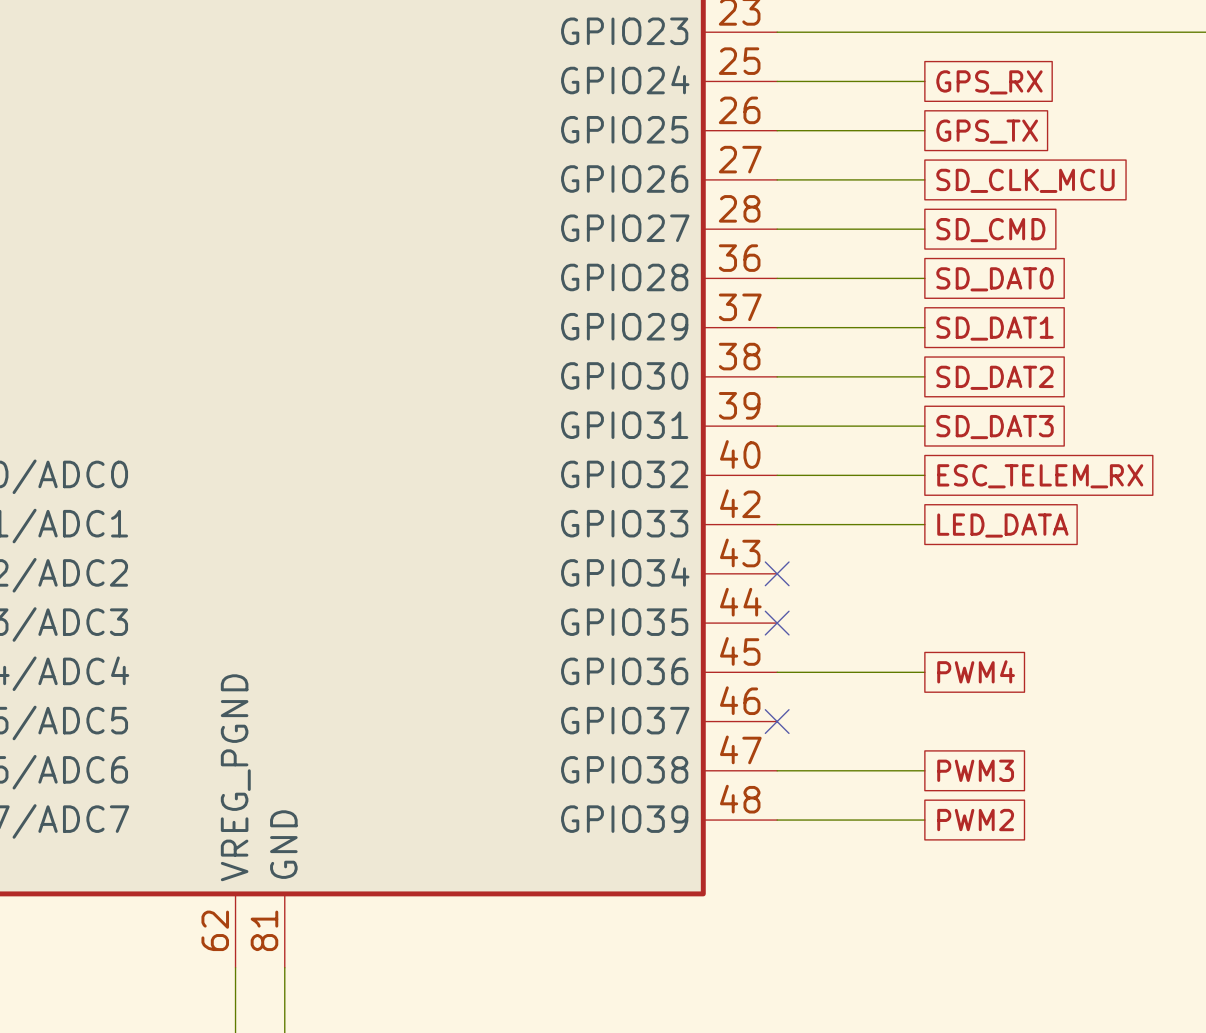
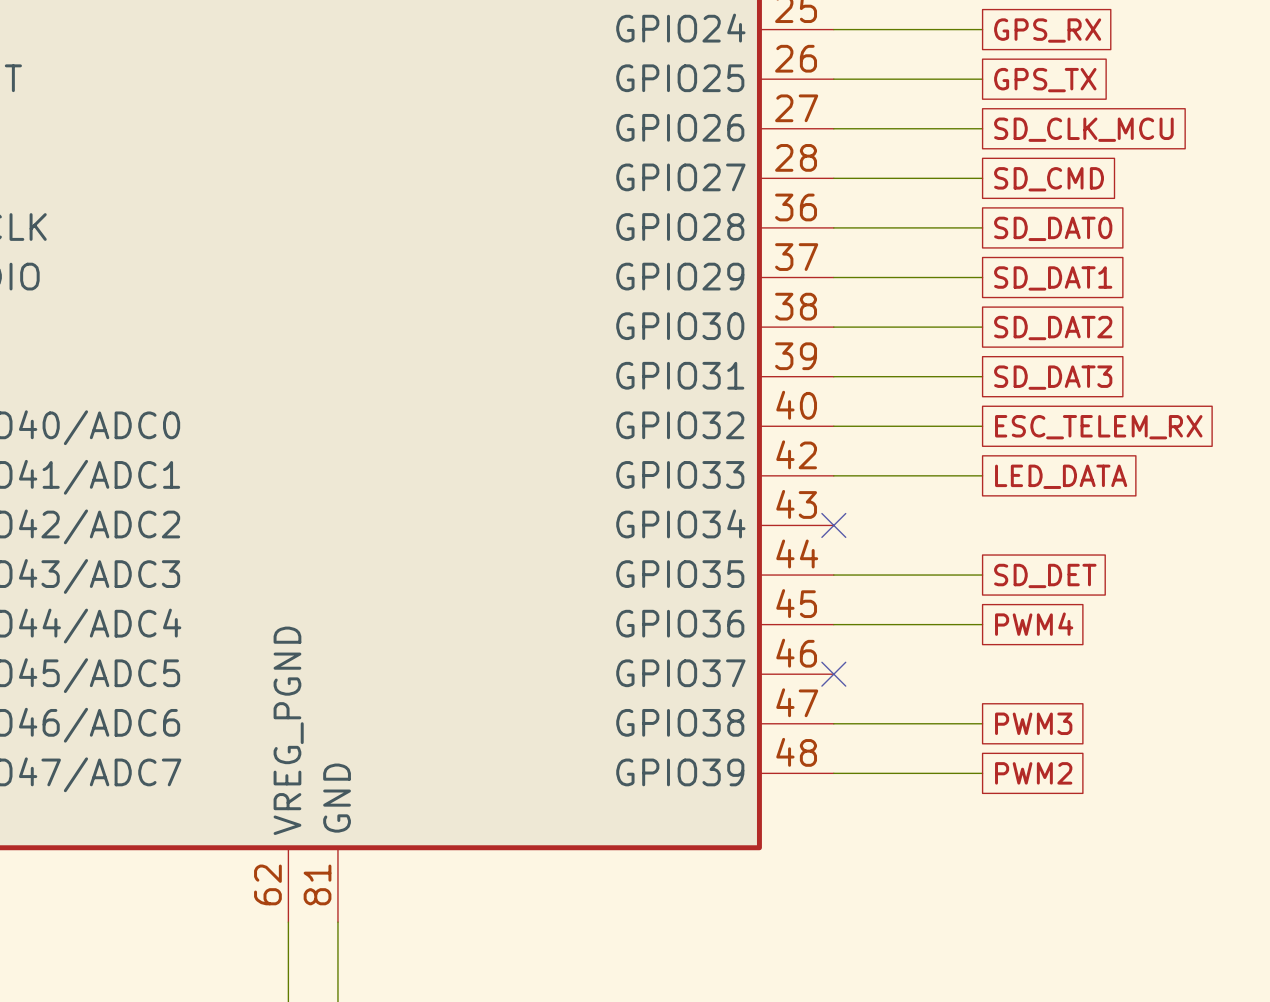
wire: none -> (833, 575) (982, 575)
no-connect mark: (777, 623) -> none
global label: none -> SD_DET (1045, 575)

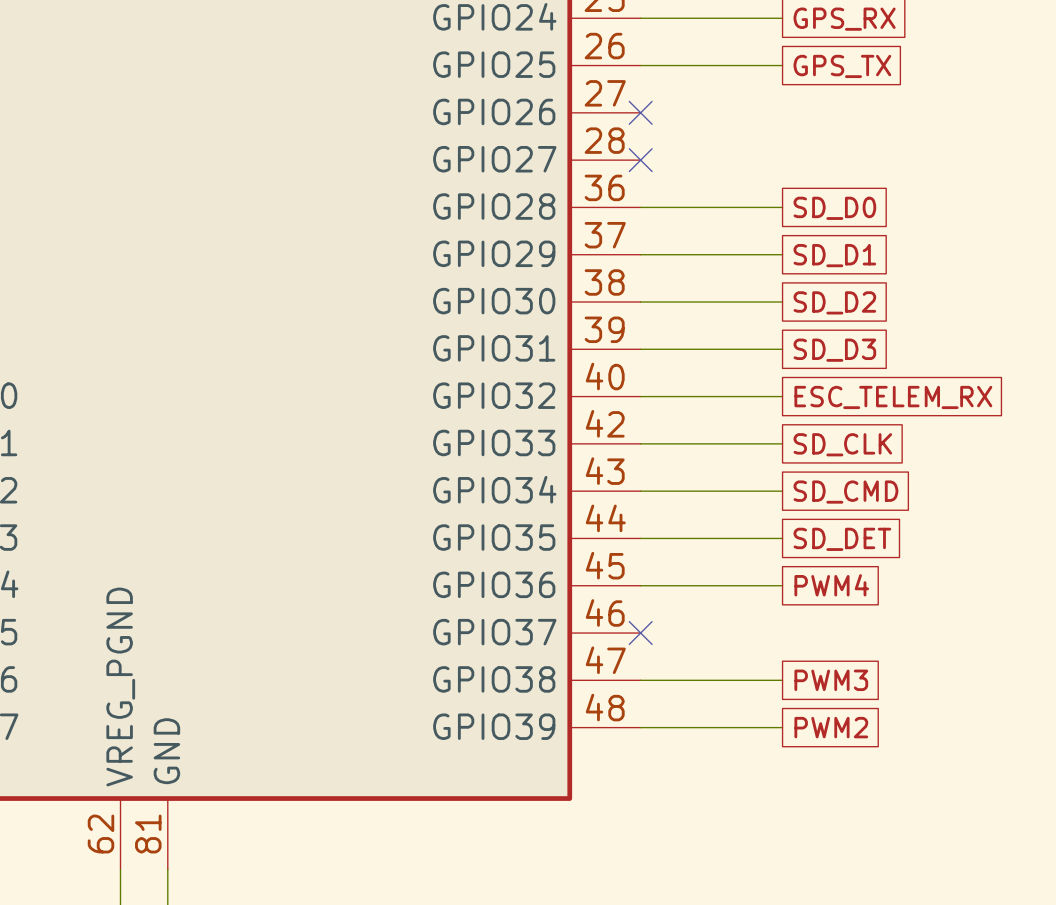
wire: (833, 128) (982, 128) -> none
no-connect mark: none -> (640, 112)
global label: SD_CLK_MCU (1083, 129) -> none
wire: (833, 178) (982, 178) -> (640, 491) (782, 491)
no-connect mark: none -> (640, 160)
global label position: SD_CMD (1049, 179) -> SD_CMD (845, 492)
global label: SD_DAT0 (1053, 228) -> SD_D0 (834, 208)
global label: SD_DAT1 (1053, 278) -> SD_D1 (834, 255)
global label: SD_DAT2 (1053, 328) -> SD_D2 (834, 302)
global label: SD_DAT3 (1053, 377) -> SD_D3 (834, 350)
global label: LED_DATA (1061, 476) -> SD_CLK (842, 444)
no-connect mark: (833, 525) -> none

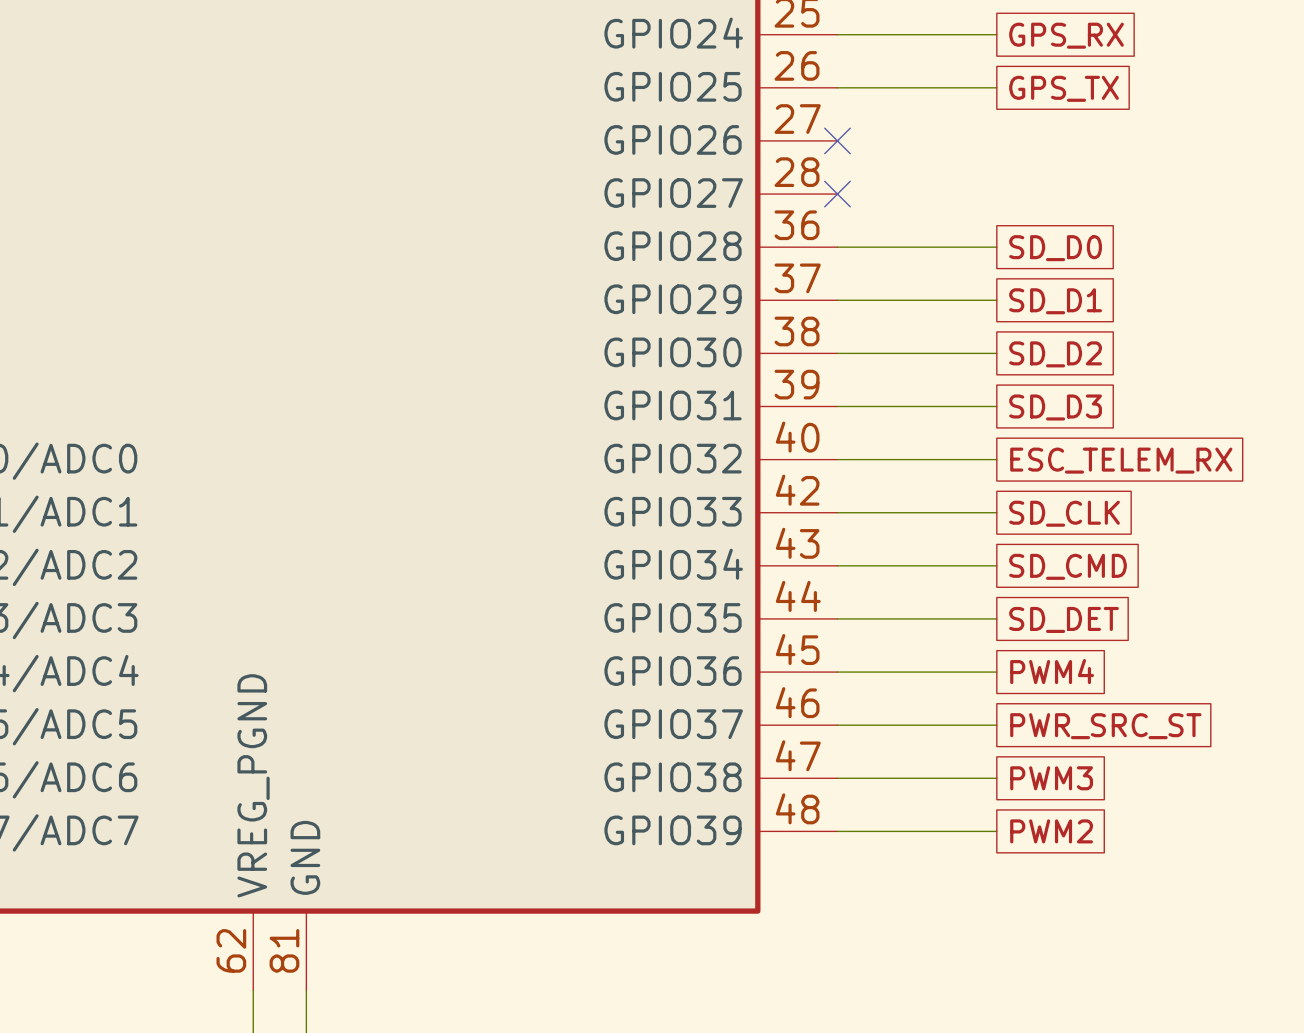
wire: none -> (837, 725) (996, 725)
no-connect mark: (640, 633) -> none
global label: none -> PWR_SRC_ST (1105, 726)

